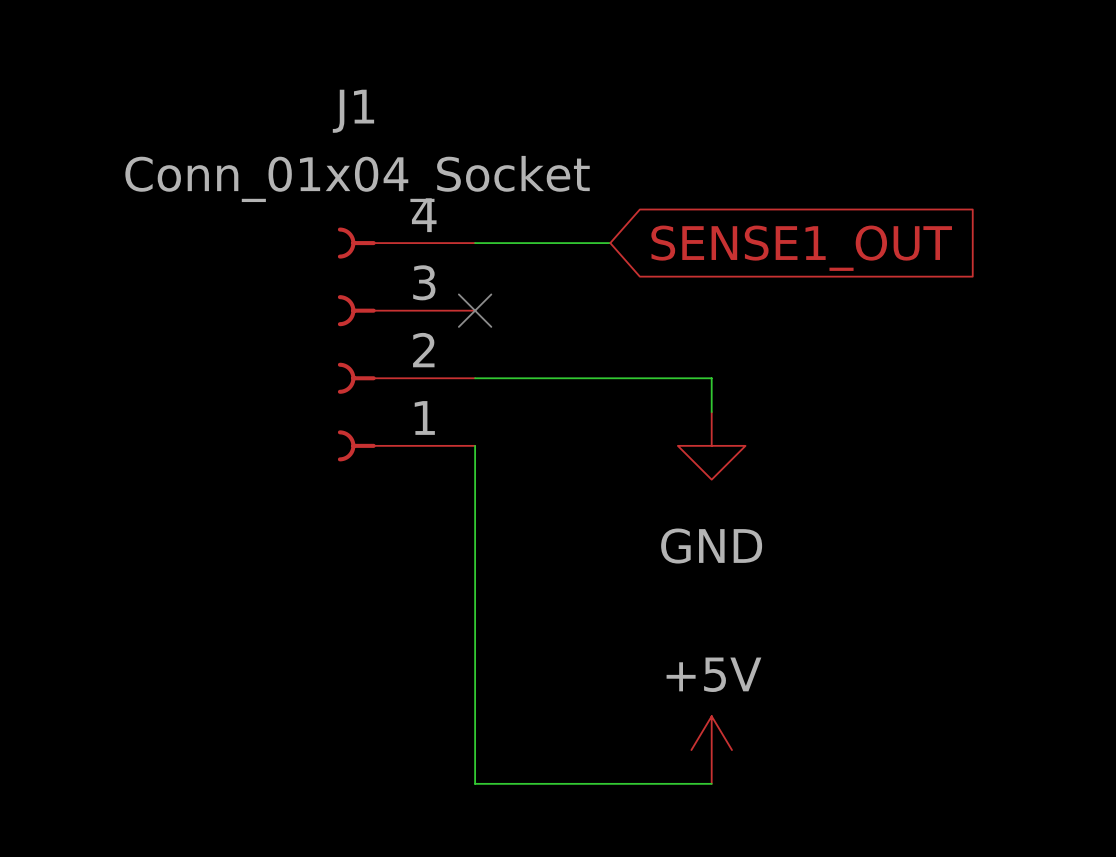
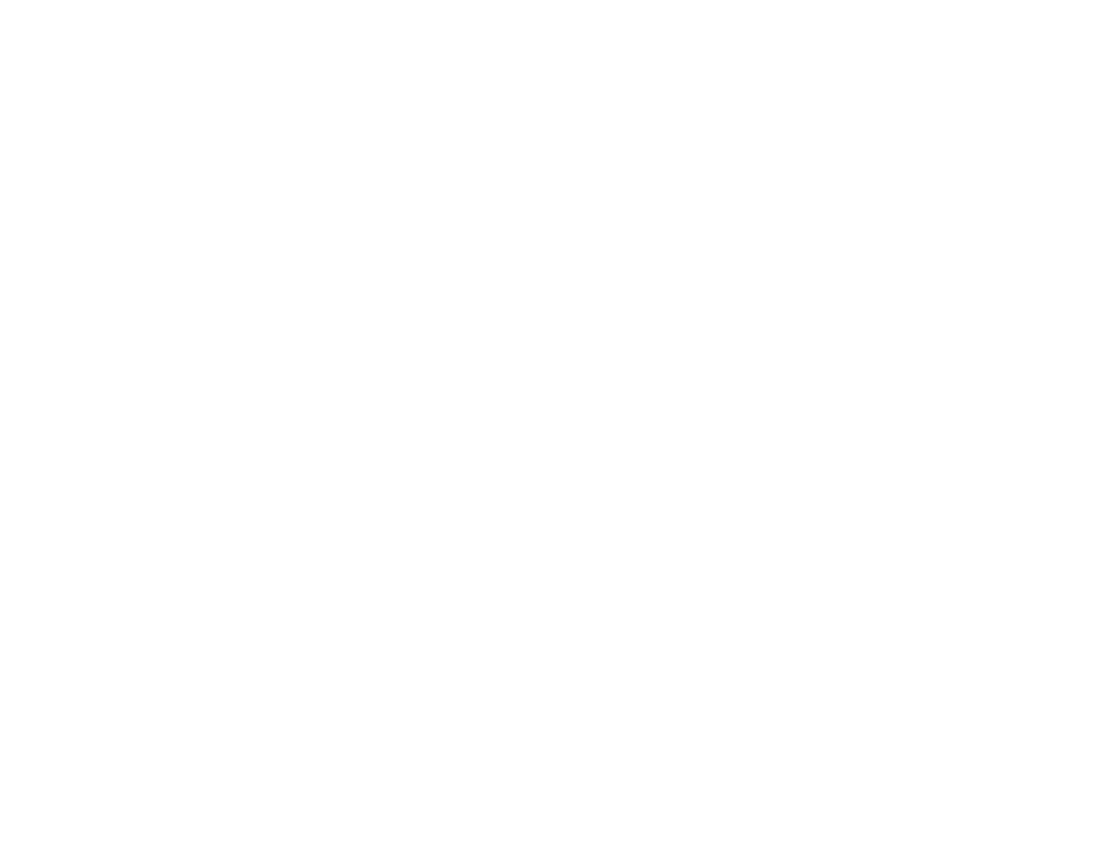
wire: (475, 243) (610, 243) -> none
global label: SENSE1_OUT (801, 248) -> none
no-connect mark: (475, 310) -> none
J1: Conn_01x04_Socket (406, 344) -> none
wire: (475, 378) (711, 378) (711, 412) -> none
wire: (475, 445) (475, 783) (711, 783) -> none
power symbol: GND (711, 445) -> none
power symbol: +5V (711, 750) -> none

